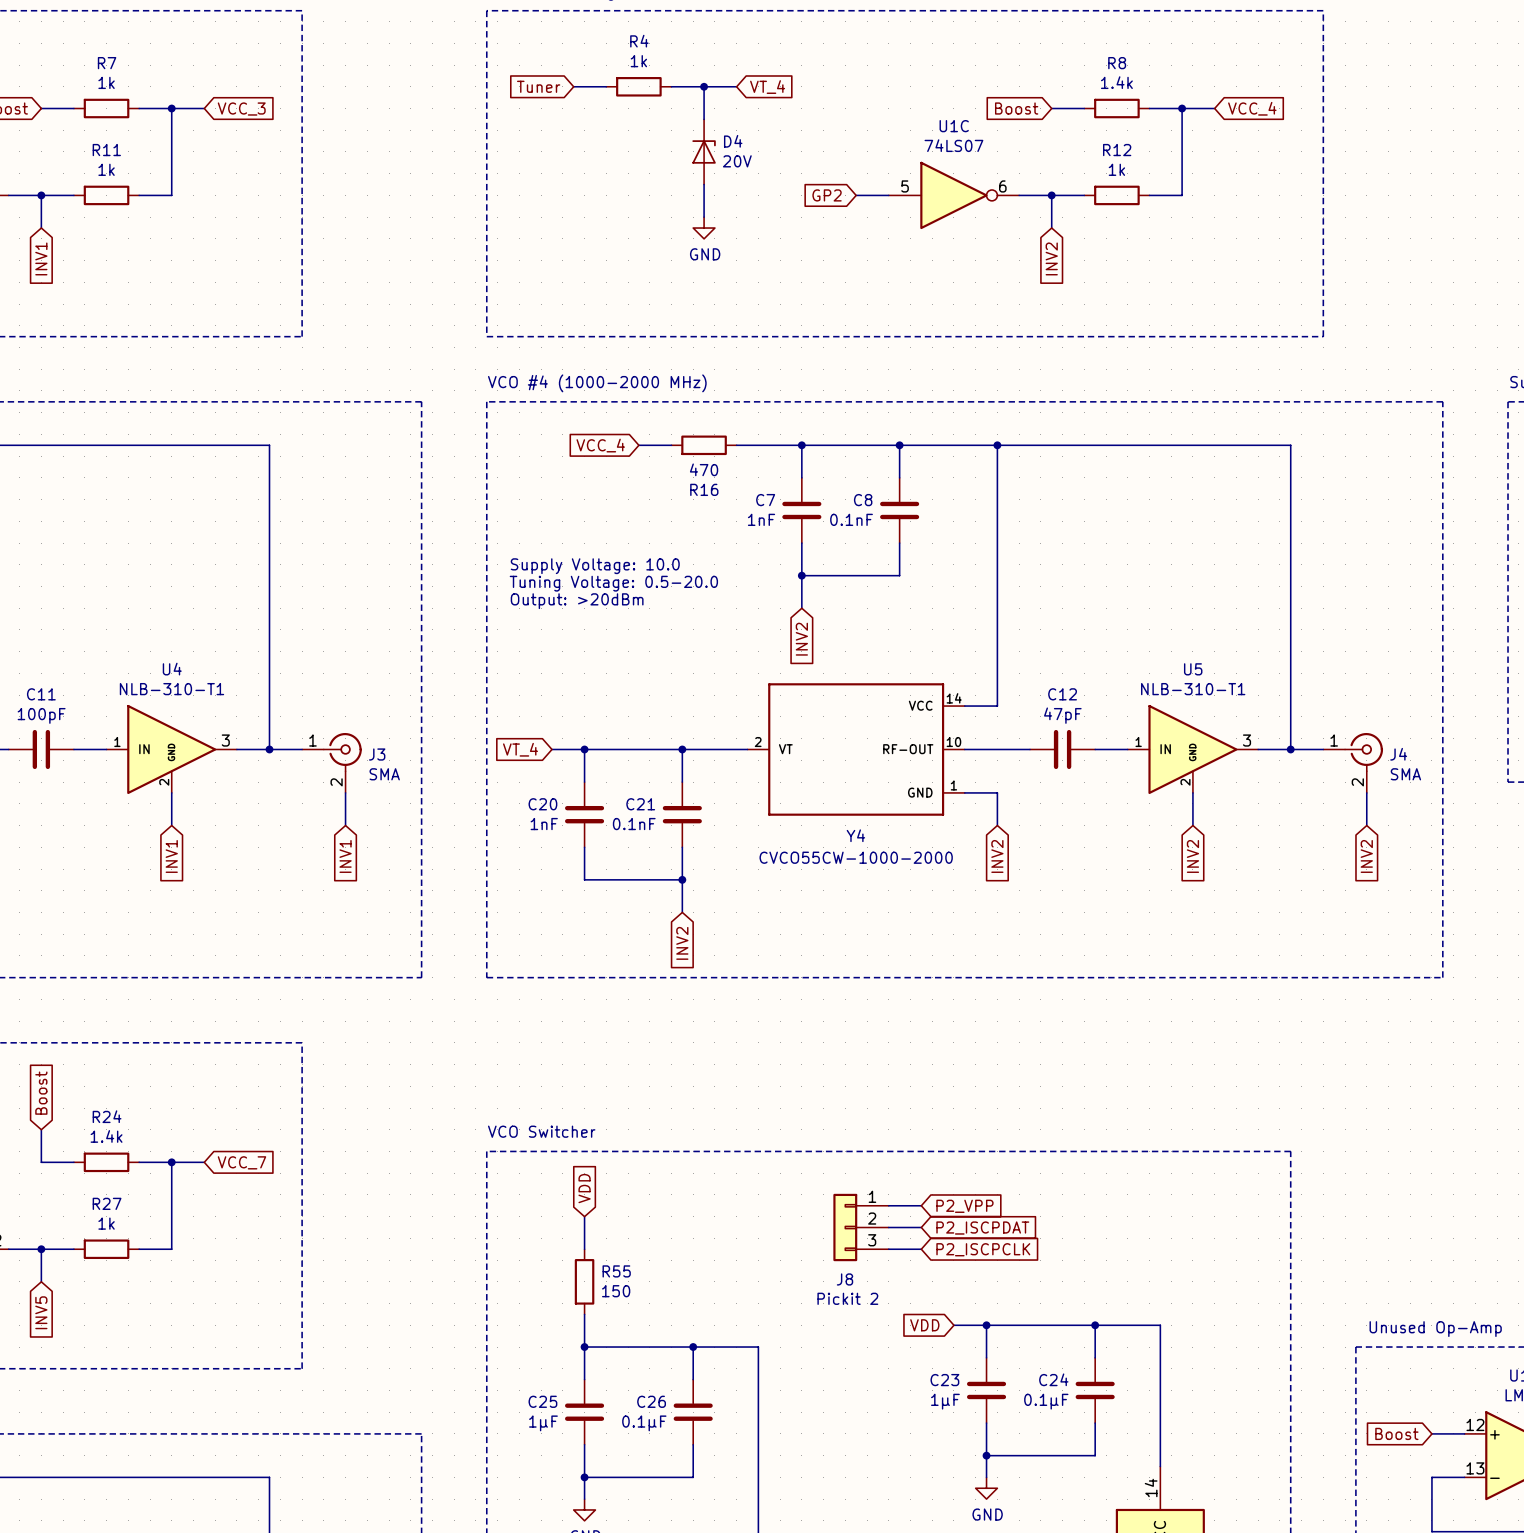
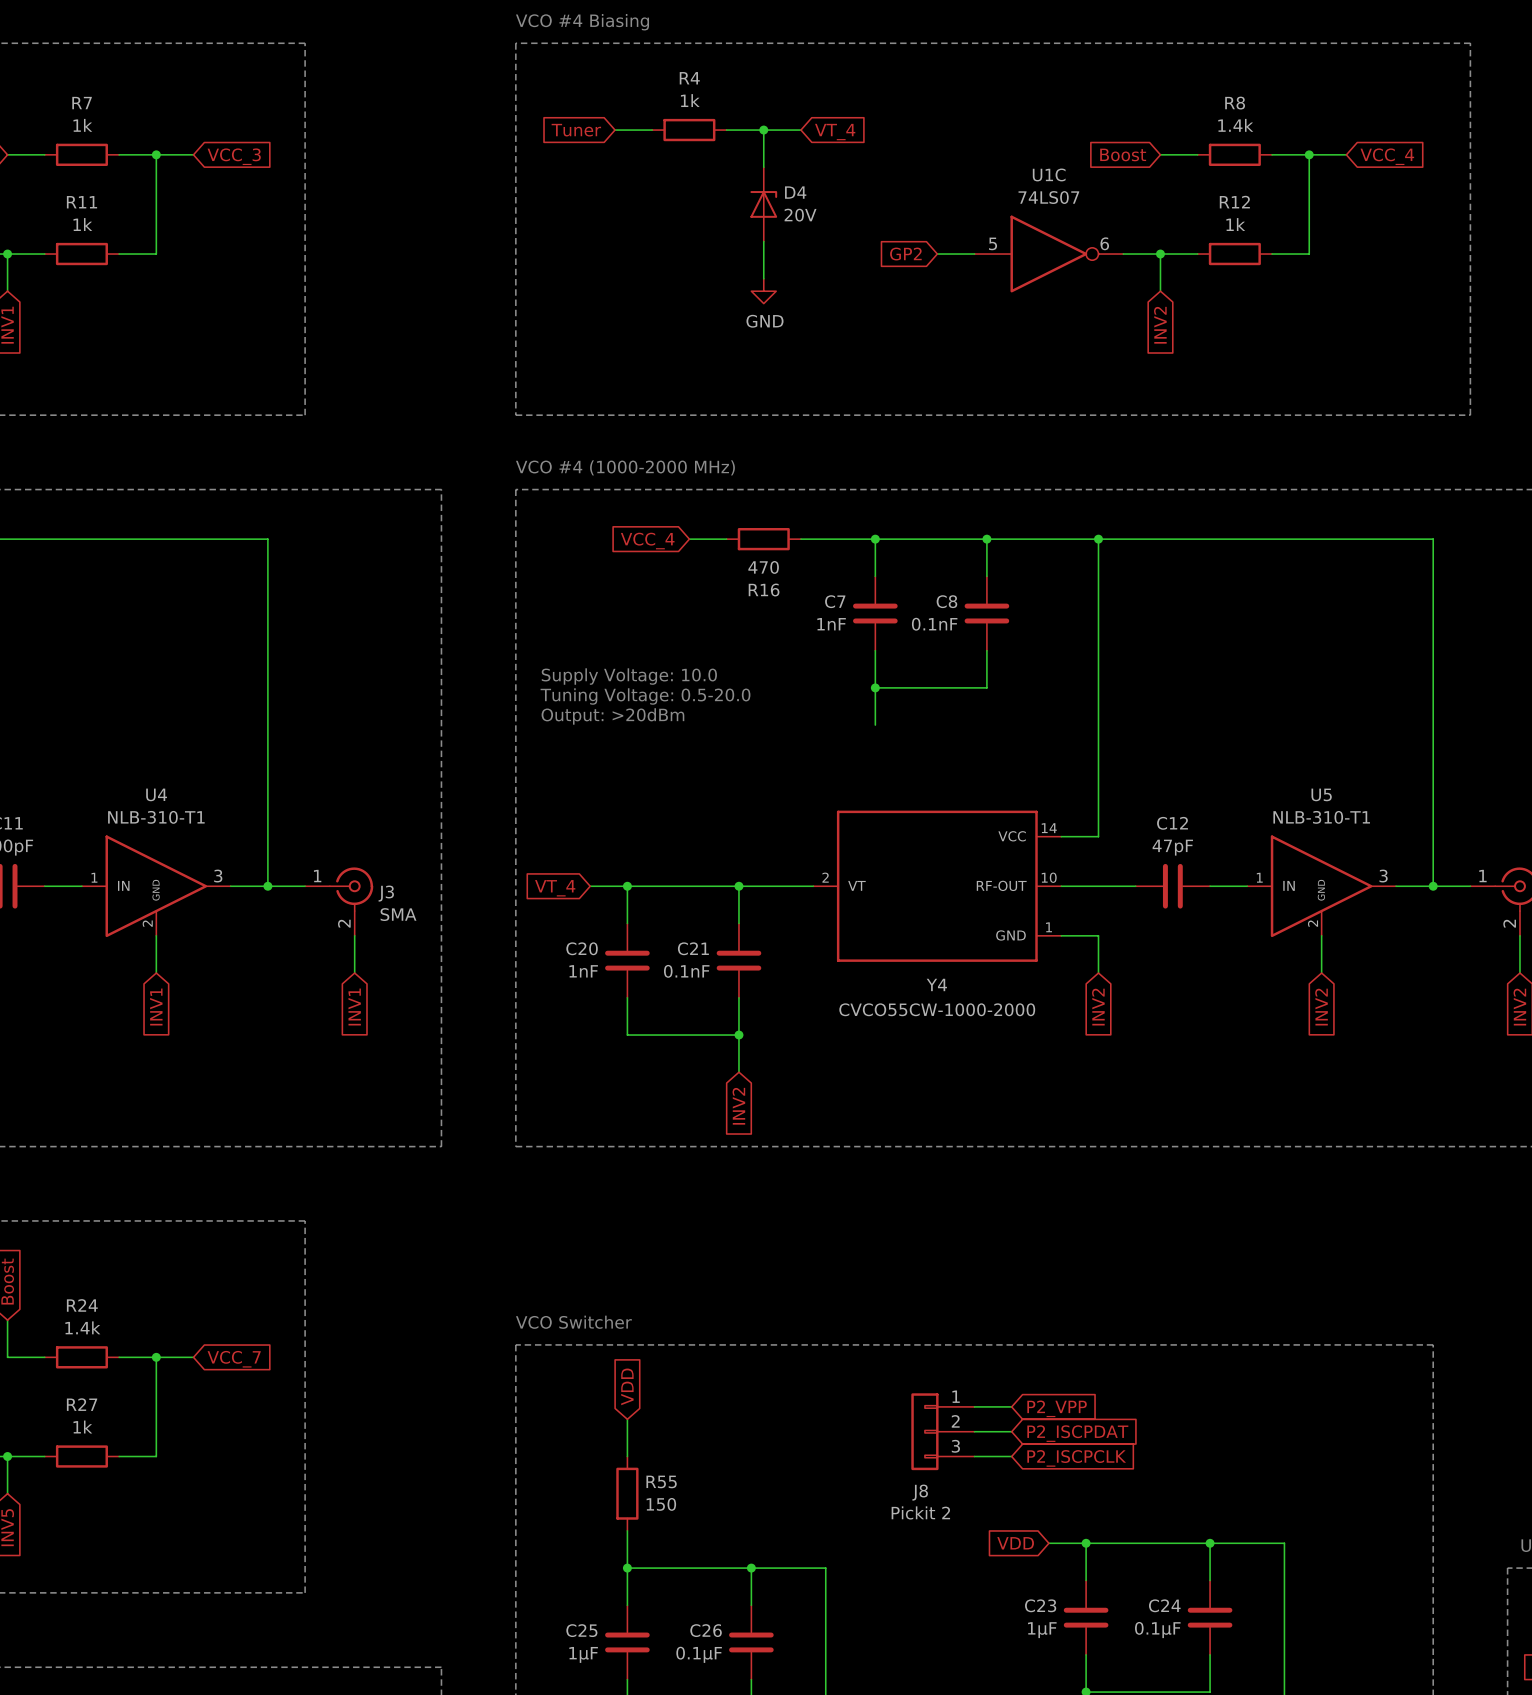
global label: INV2 (801, 639) -> none

